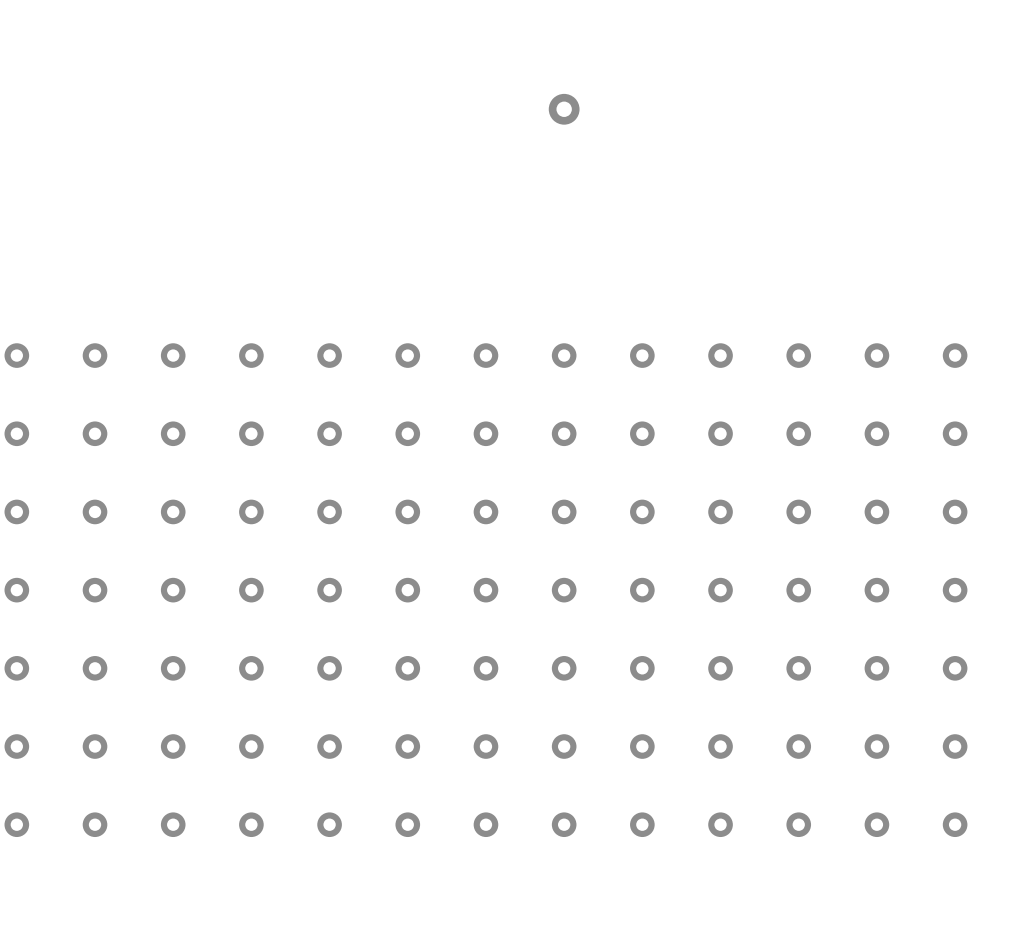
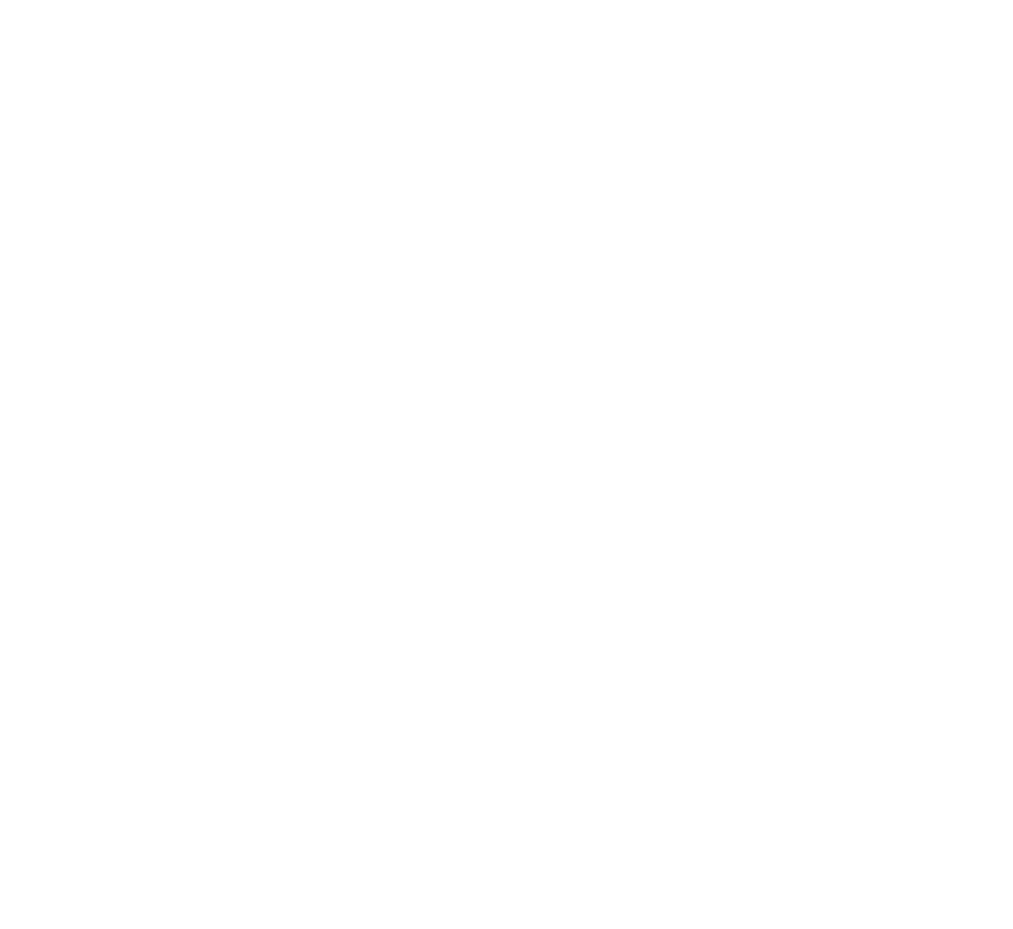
part: (564, 109) -> none
via: (16, 355) -> none
via: (95, 355) -> none
via: (173, 355) -> none
via: (251, 355) -> none
via: (329, 355) -> none
via: (407, 355) -> none
via: (485, 355) -> none
via: (564, 355) -> none
via: (642, 355) -> none
via: (720, 355) -> none
via: (798, 355) -> none
via: (876, 355) -> none
via: (955, 355) -> none
via: (16, 433) -> none
via: (95, 433) -> none
via: (173, 433) -> none
via: (251, 433) -> none
via: (329, 433) -> none
via: (407, 433) -> none
via: (485, 433) -> none
via: (564, 433) -> none
via: (642, 433) -> none
via: (720, 433) -> none
via: (798, 433) -> none
via: (876, 433) -> none
via: (955, 433) -> none
via: (16, 511) -> none
via: (95, 511) -> none
via: (173, 511) -> none
via: (251, 511) -> none
via: (329, 511) -> none
via: (407, 511) -> none
via: (485, 511) -> none
via: (564, 511) -> none
via: (642, 511) -> none
via: (720, 511) -> none
via: (798, 511) -> none
via: (876, 511) -> none
via: (955, 511) -> none
via: (16, 590) -> none
via: (95, 590) -> none
via: (173, 590) -> none
via: (251, 590) -> none
via: (329, 590) -> none
via: (407, 590) -> none
via: (485, 590) -> none
via: (564, 590) -> none
via: (642, 590) -> none
via: (720, 590) -> none
via: (798, 590) -> none
via: (876, 590) -> none
via: (955, 590) -> none
via: (16, 668) -> none
via: (95, 668) -> none
via: (173, 668) -> none
via: (251, 668) -> none
via: (329, 668) -> none
via: (407, 668) -> none
via: (485, 668) -> none
via: (564, 668) -> none
via: (642, 668) -> none
via: (720, 668) -> none
via: (798, 668) -> none
via: (876, 668) -> none
via: (955, 668) -> none
via: (16, 746) -> none
via: (95, 746) -> none
via: (173, 746) -> none
via: (251, 746) -> none
via: (329, 746) -> none
via: (407, 746) -> none
via: (485, 746) -> none
via: (564, 746) -> none
via: (642, 746) -> none
via: (720, 746) -> none
via: (798, 746) -> none
via: (876, 746) -> none
via: (955, 746) -> none
via: (16, 824) -> none
via: (95, 824) -> none
via: (173, 824) -> none
via: (251, 824) -> none
via: (329, 824) -> none
via: (407, 824) -> none
via: (485, 824) -> none
via: (564, 824) -> none
via: (642, 824) -> none
via: (720, 824) -> none
via: (798, 824) -> none
via: (876, 824) -> none
via: (955, 824) -> none

